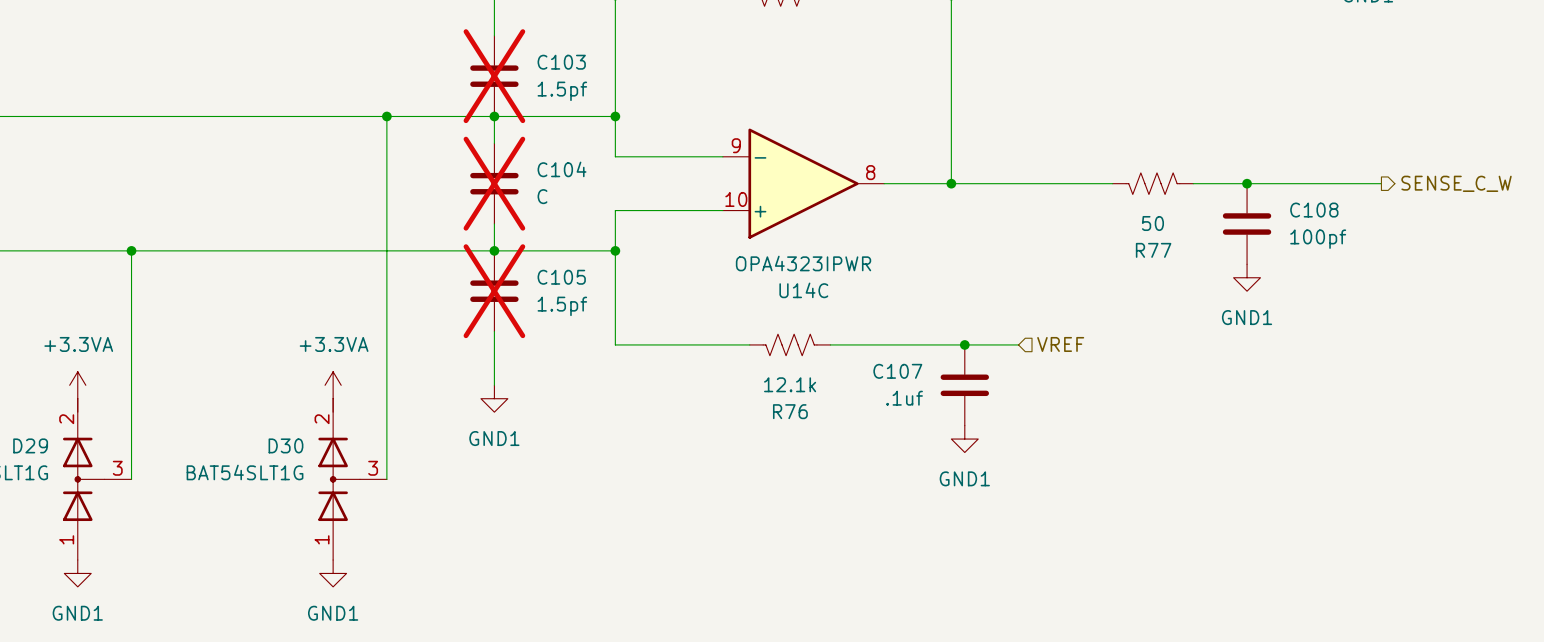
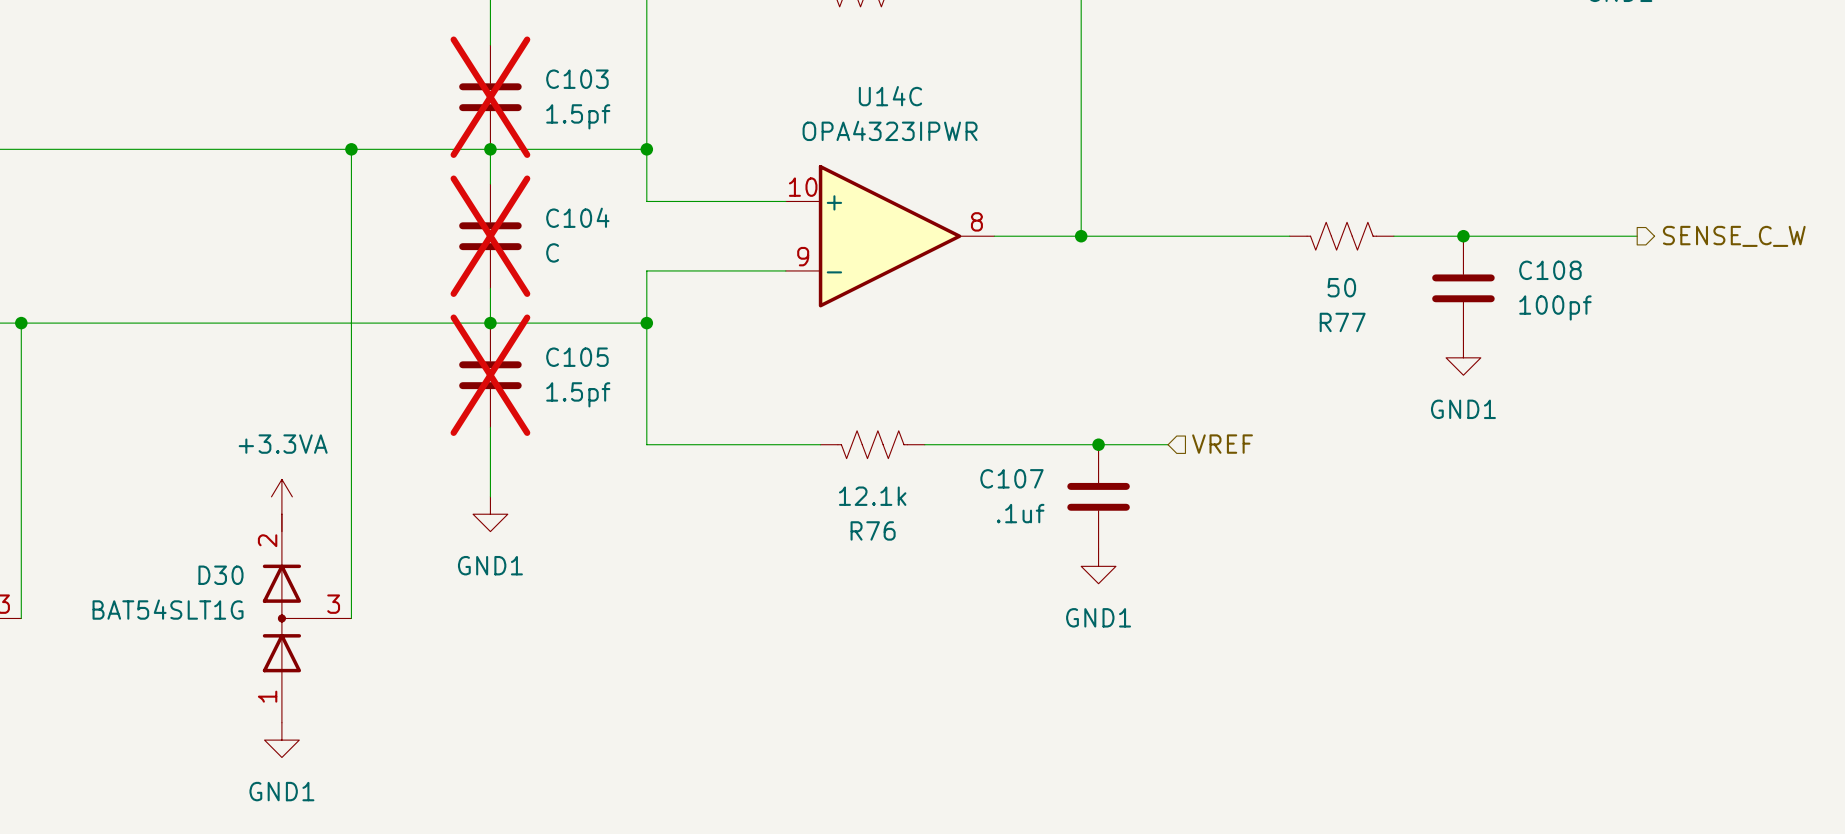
U14C flip: as is (803, 183) -> up-down (890, 236)

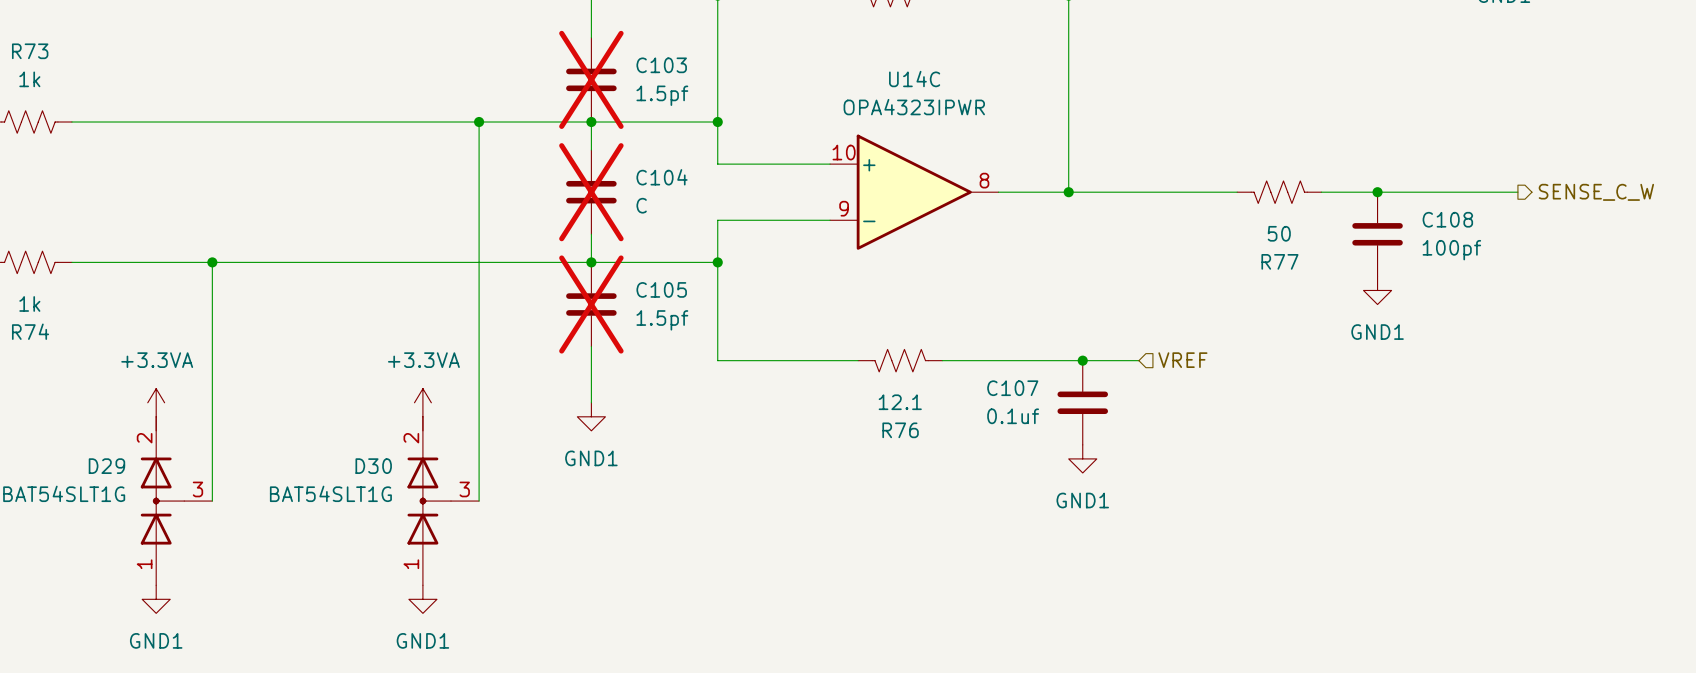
R76 value: 12.1k (872, 496) -> 12.1 (900, 402)
C107 value: .1uf (1020, 513) -> 0.1uf (1013, 416)

